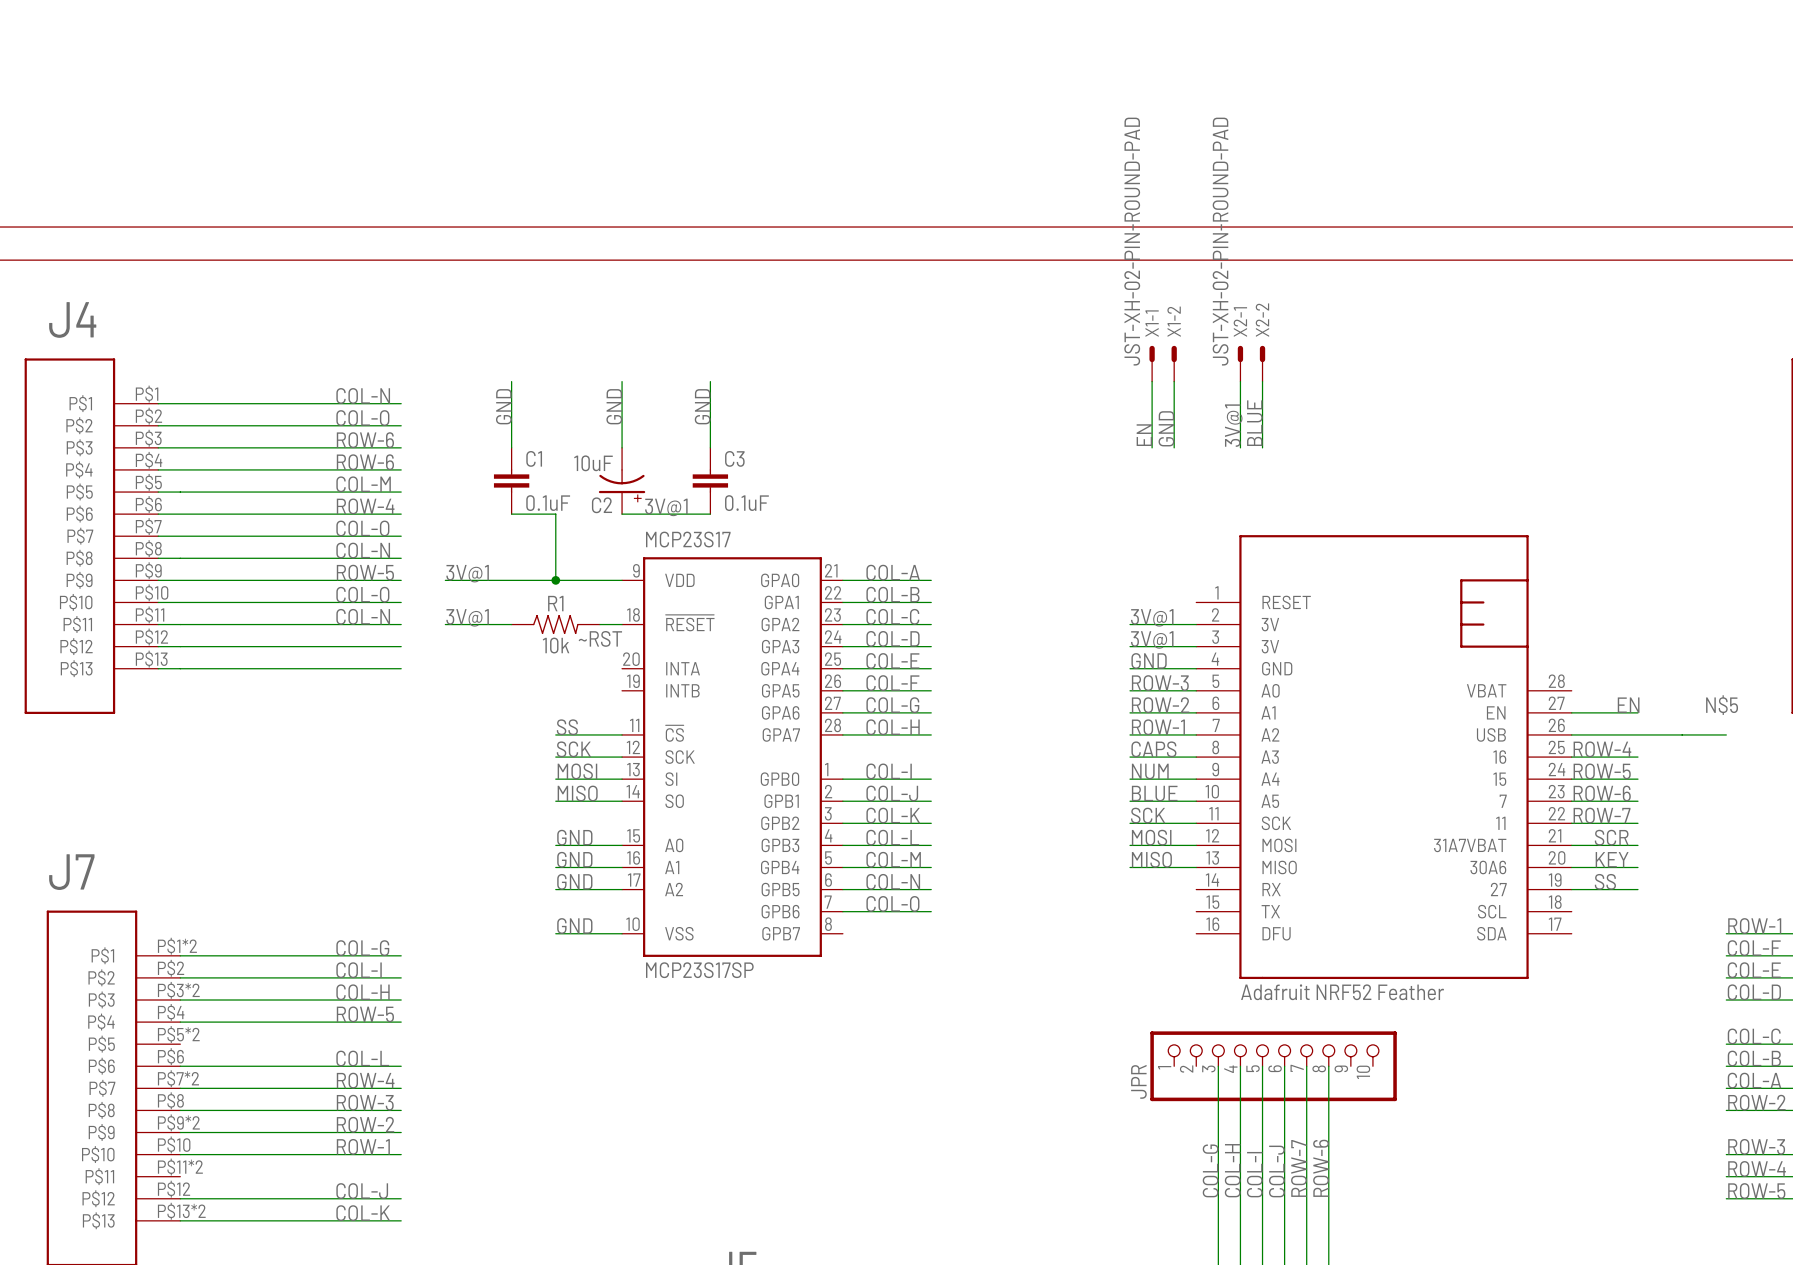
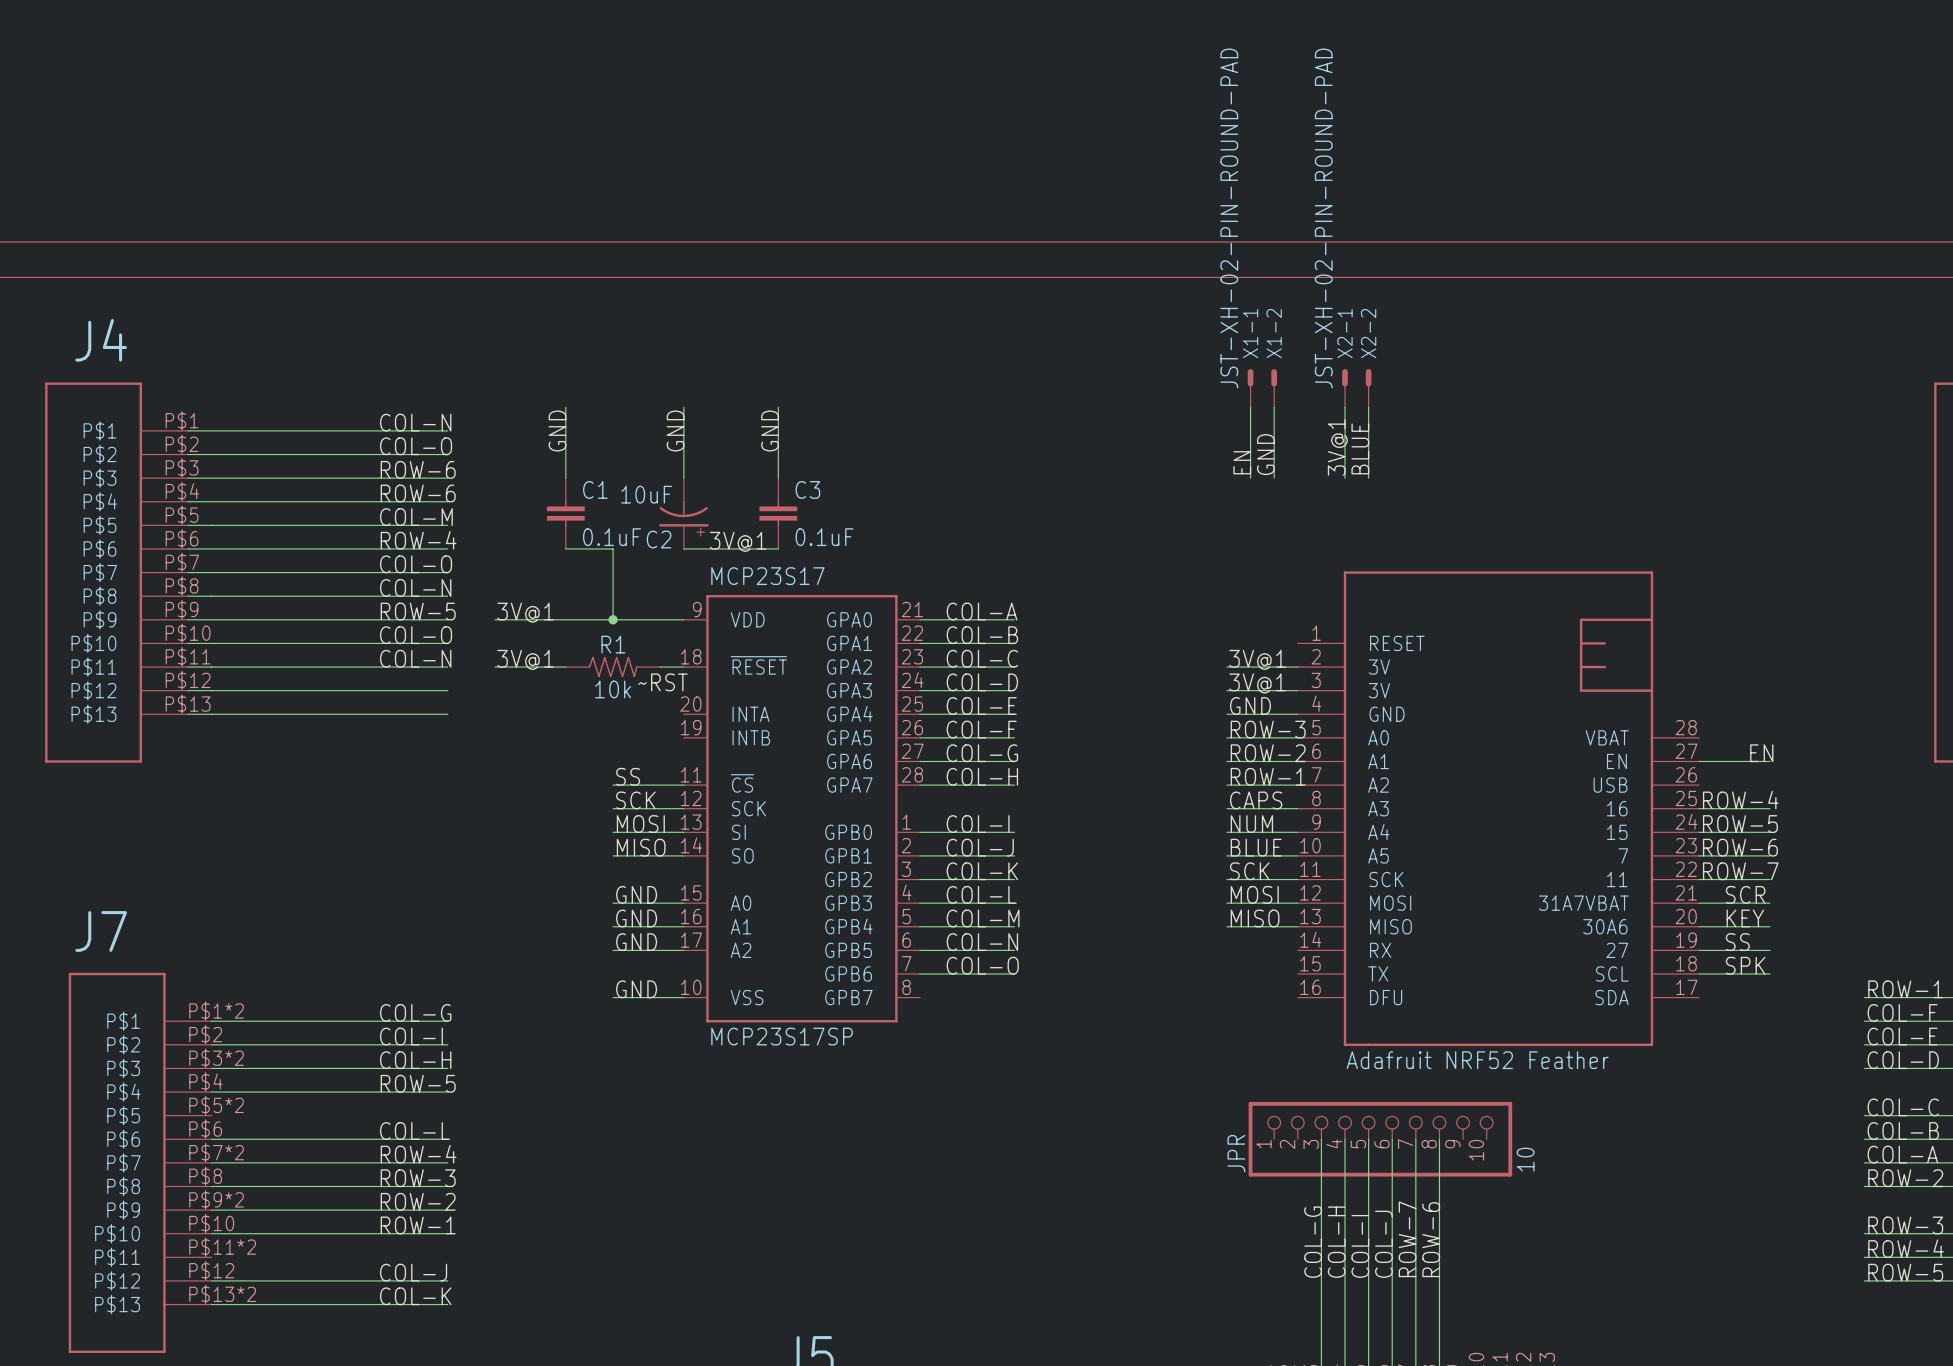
label: N$5 (1722, 705) -> none
wire: (1571, 734) (1726, 734) -> none
label: none -> SPK (1745, 965)
wire: none -> (1699, 973) (1770, 973)
JPR value: none -> 10 (1525, 1159)

